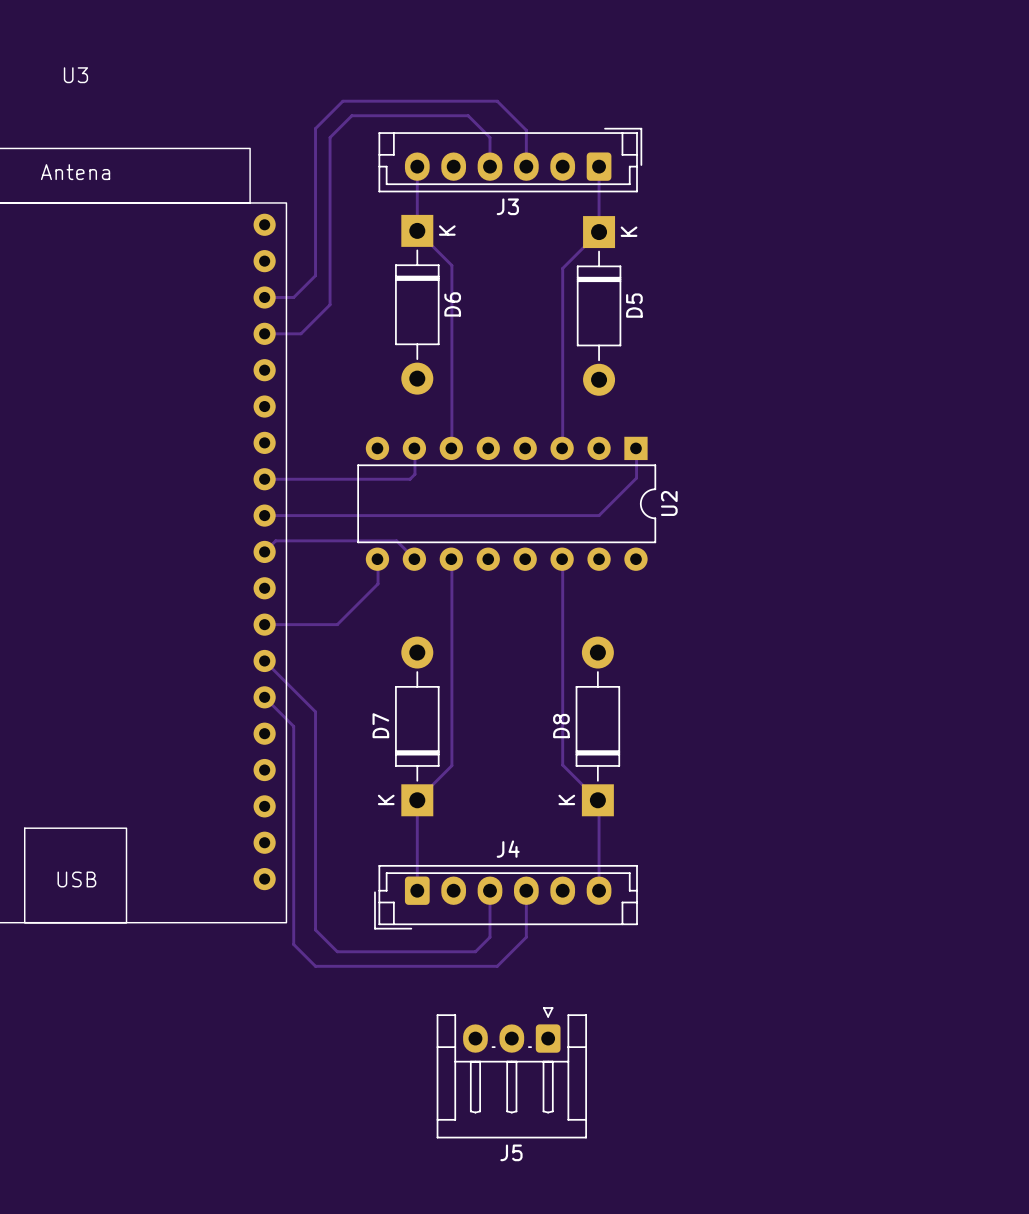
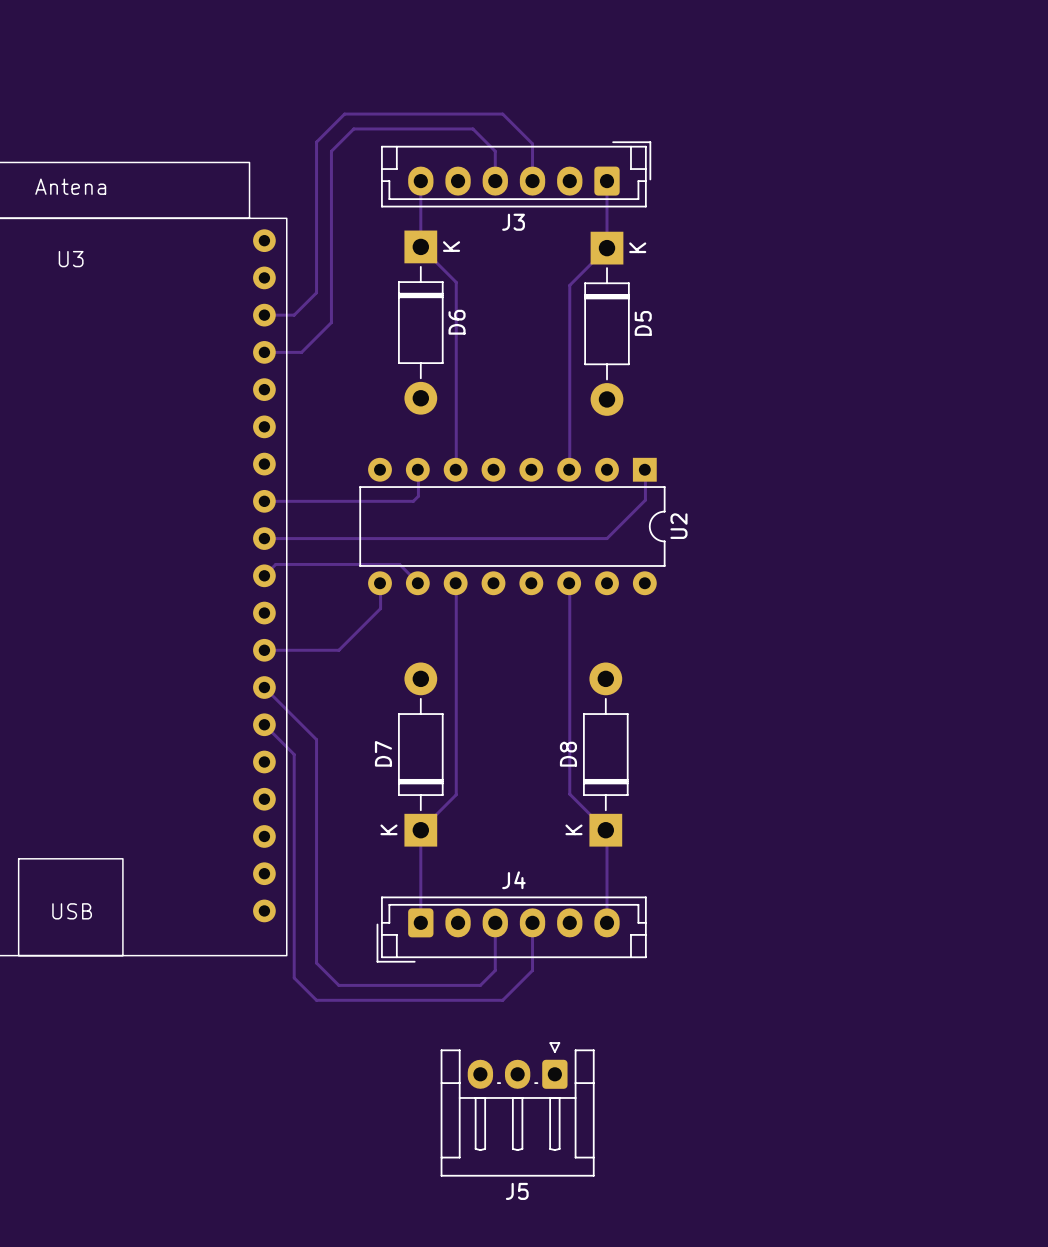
U3 name position: U3 (75, 75) -> U3 (71, 259)

